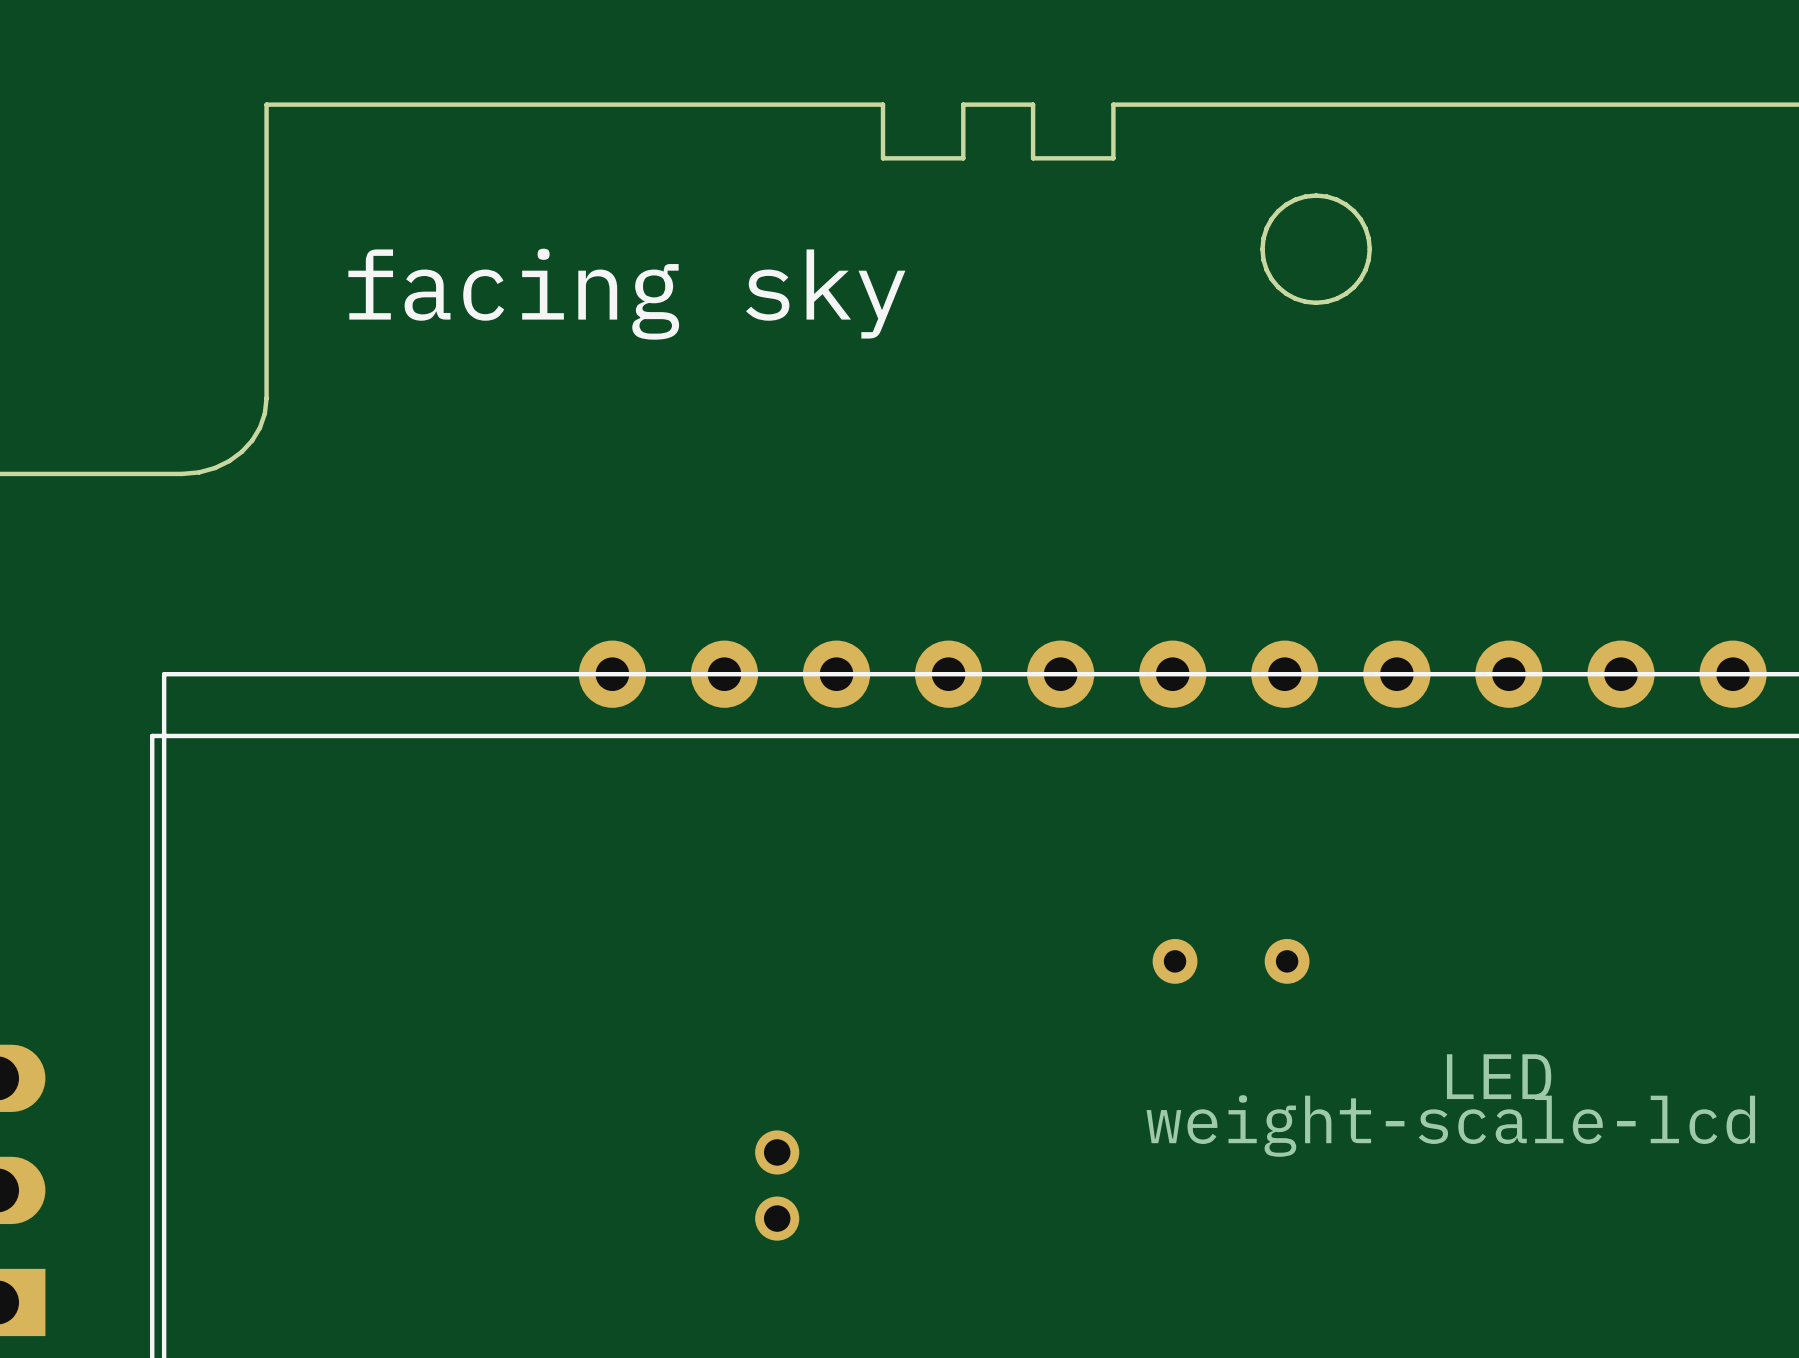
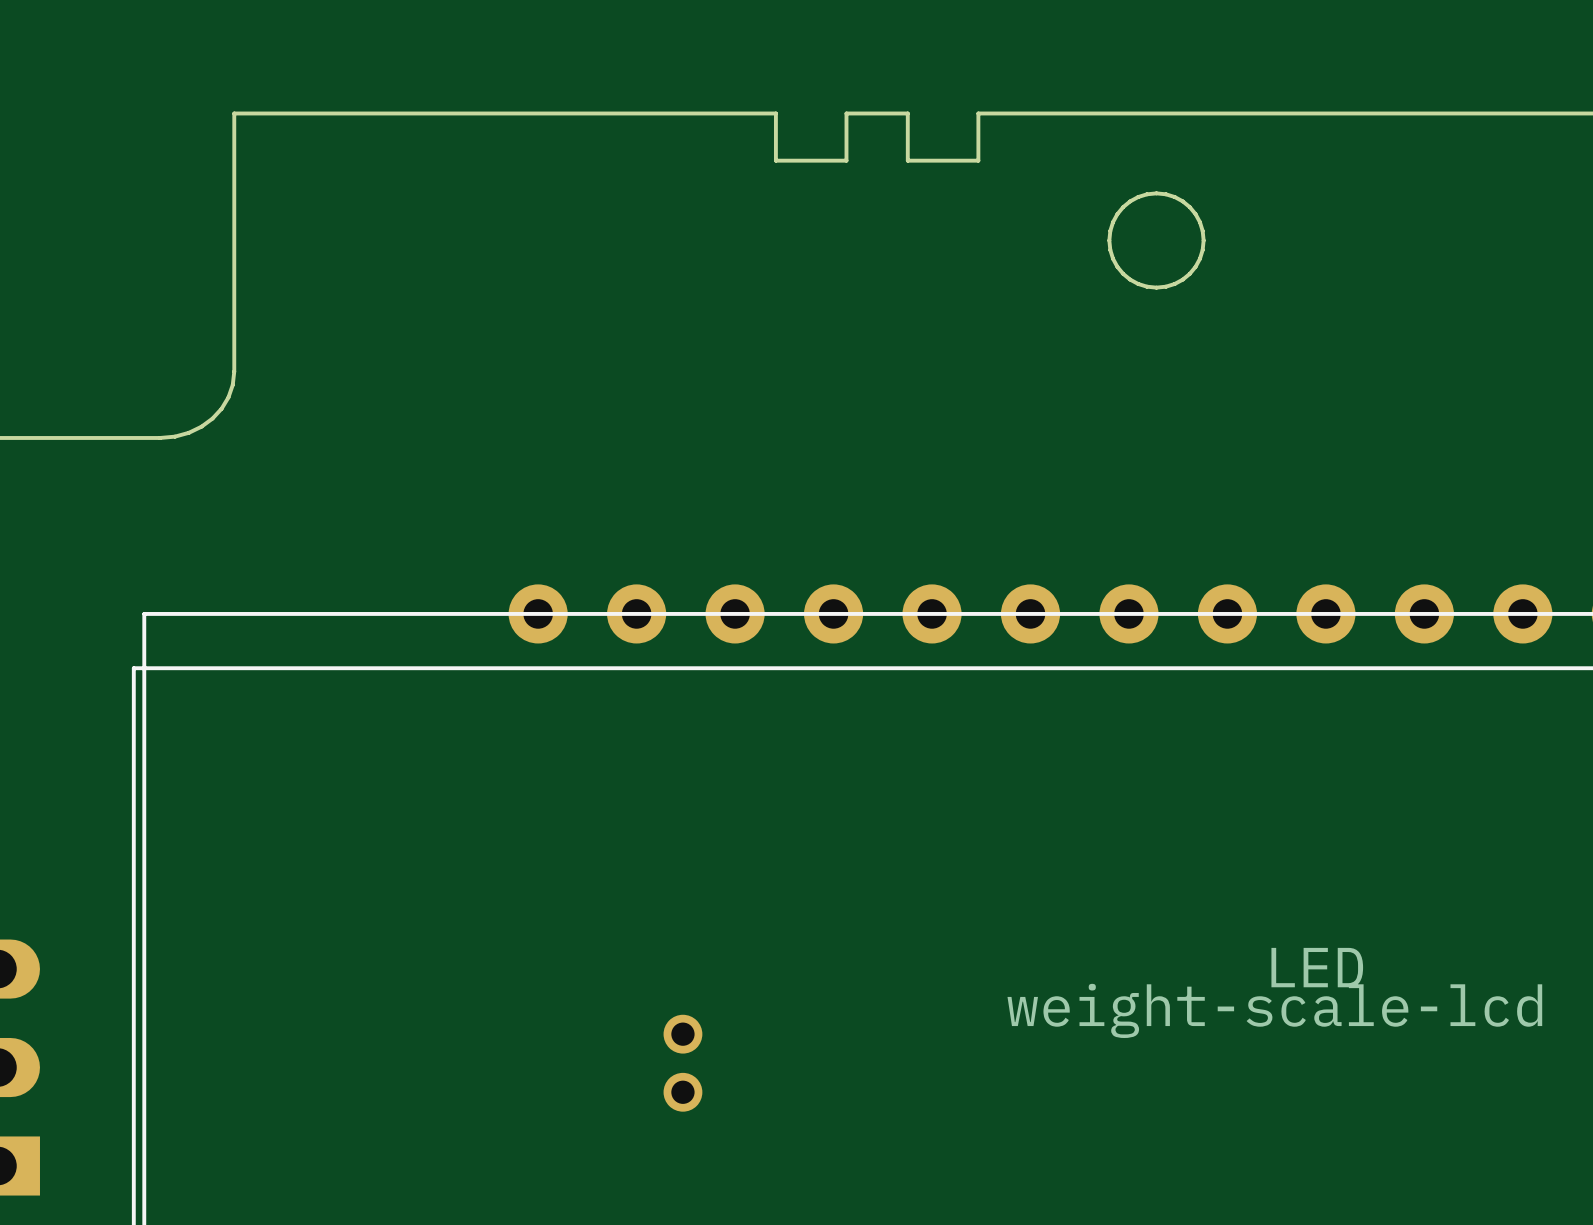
text: facing sky (626, 294) -> none
part: (1231, 961) -> none

